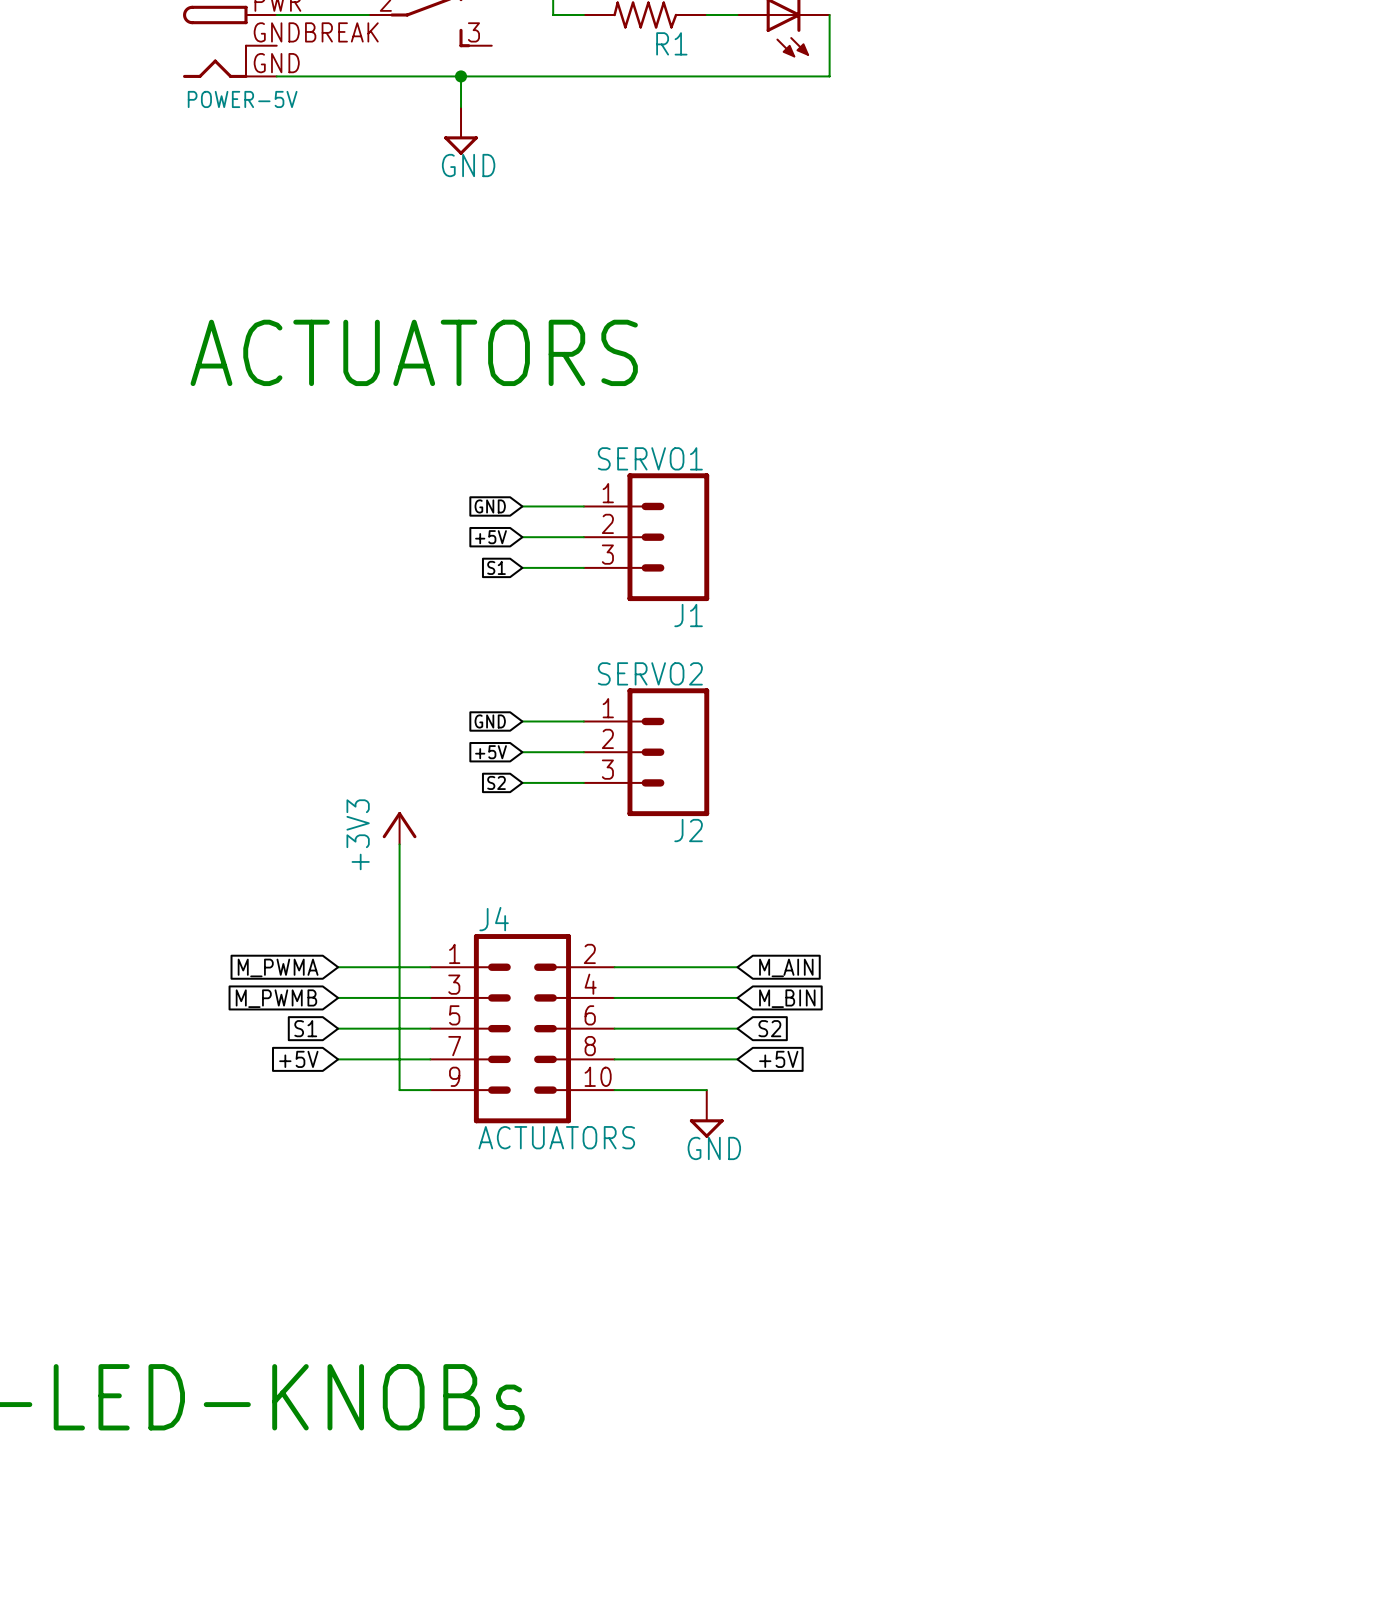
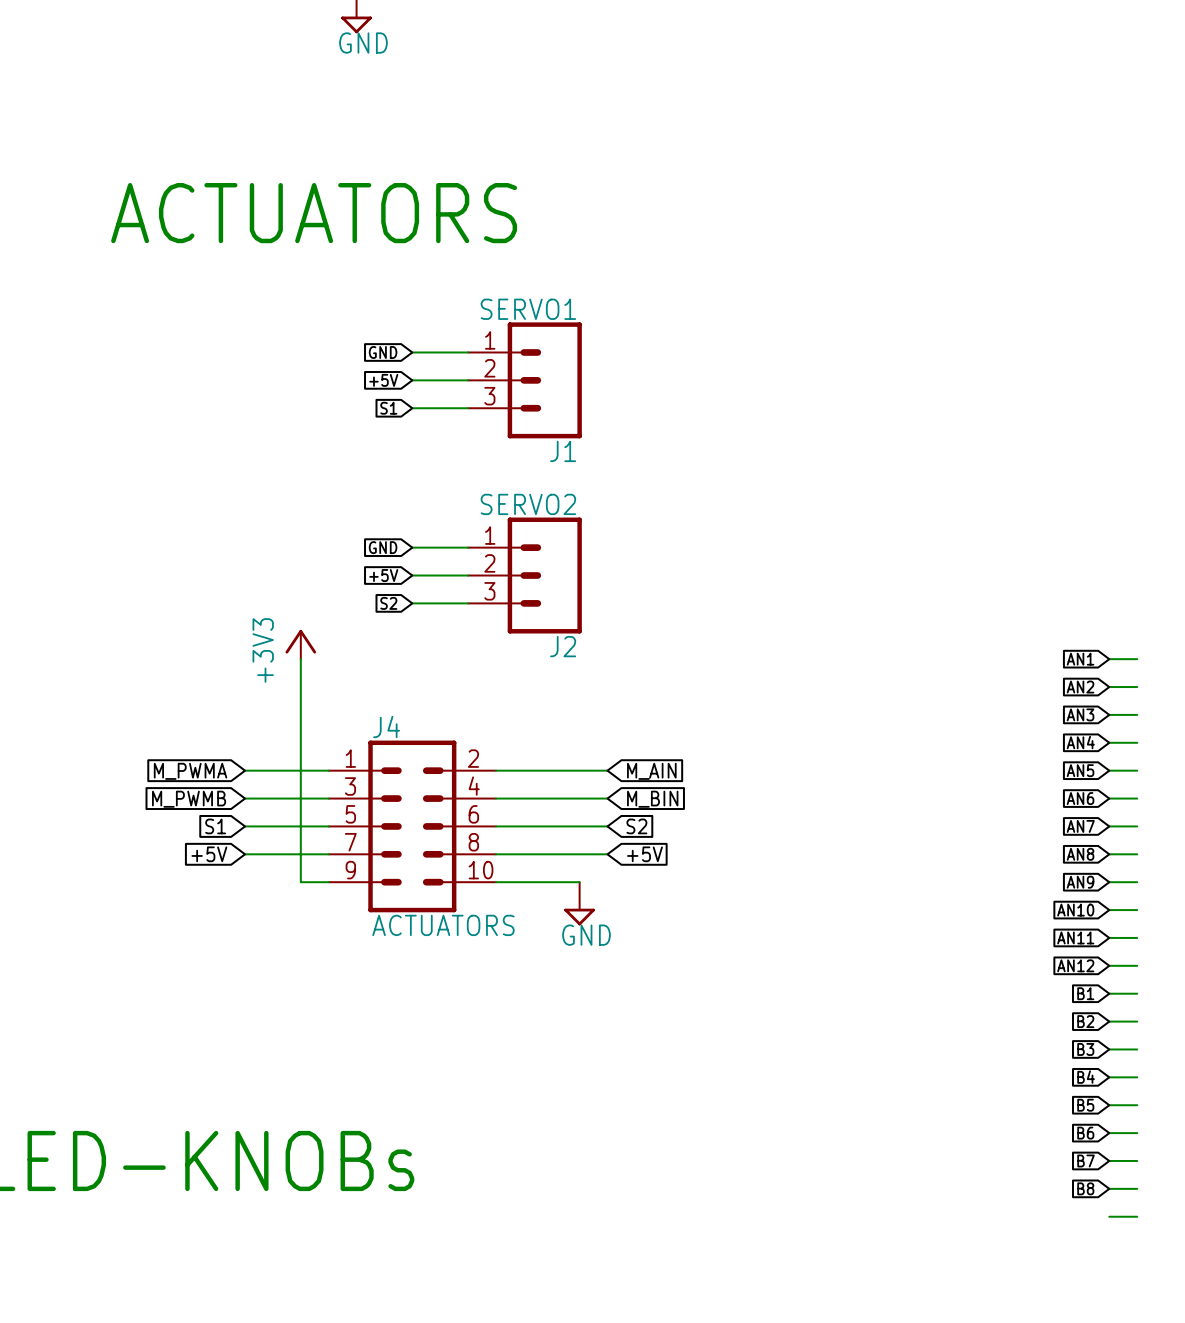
global label: none -> AN1 (1080, 659)
wire: none -> (1109, 659) (1137, 659)
global label: none -> AN2 (1080, 687)
wire: none -> (1109, 687) (1137, 687)
global label: none -> AN3 (1080, 714)
wire: none -> (1109, 714) (1137, 714)
global label: none -> AN4 (1080, 742)
wire: none -> (1109, 742) (1137, 742)
global label: none -> AN5 (1080, 770)
wire: none -> (1109, 770) (1137, 770)
global label: none -> AN6 (1080, 798)
wire: none -> (1109, 798) (1137, 798)
global label: none -> AN7 (1080, 826)
wire: none -> (1109, 826) (1137, 826)
global label: none -> AN8 (1080, 854)
wire: none -> (1109, 854) (1137, 854)
global label: none -> AN9 (1080, 882)
wire: none -> (1109, 882) (1137, 882)
global label: none -> AN10 (1075, 910)
wire: none -> (1109, 910) (1137, 910)
global label: none -> AN11 (1075, 937)
wire: none -> (1109, 937) (1137, 937)
global label: none -> AN12 (1075, 965)
wire: none -> (1109, 965) (1137, 965)
global label: none -> B1 (1085, 993)
wire: none -> (1109, 993) (1137, 993)
global label: none -> B2 (1085, 1021)
wire: none -> (1109, 1021) (1137, 1021)
global label: none -> B3 (1085, 1049)
wire: none -> (1109, 1049) (1137, 1049)
global label: none -> B4 (1086, 1077)
wire: none -> (1109, 1077) (1137, 1077)
global label: none -> B5 (1085, 1105)
wire: none -> (1109, 1105) (1137, 1105)
global label: none -> B6 (1085, 1133)
wire: none -> (1109, 1133) (1137, 1133)
global label: none -> B7 (1086, 1160)
wire: none -> (1109, 1160) (1137, 1160)
global label: none -> B8 (1085, 1188)
wire: none -> (1109, 1188) (1137, 1188)
wire: none -> (1109, 1216) (1137, 1216)

